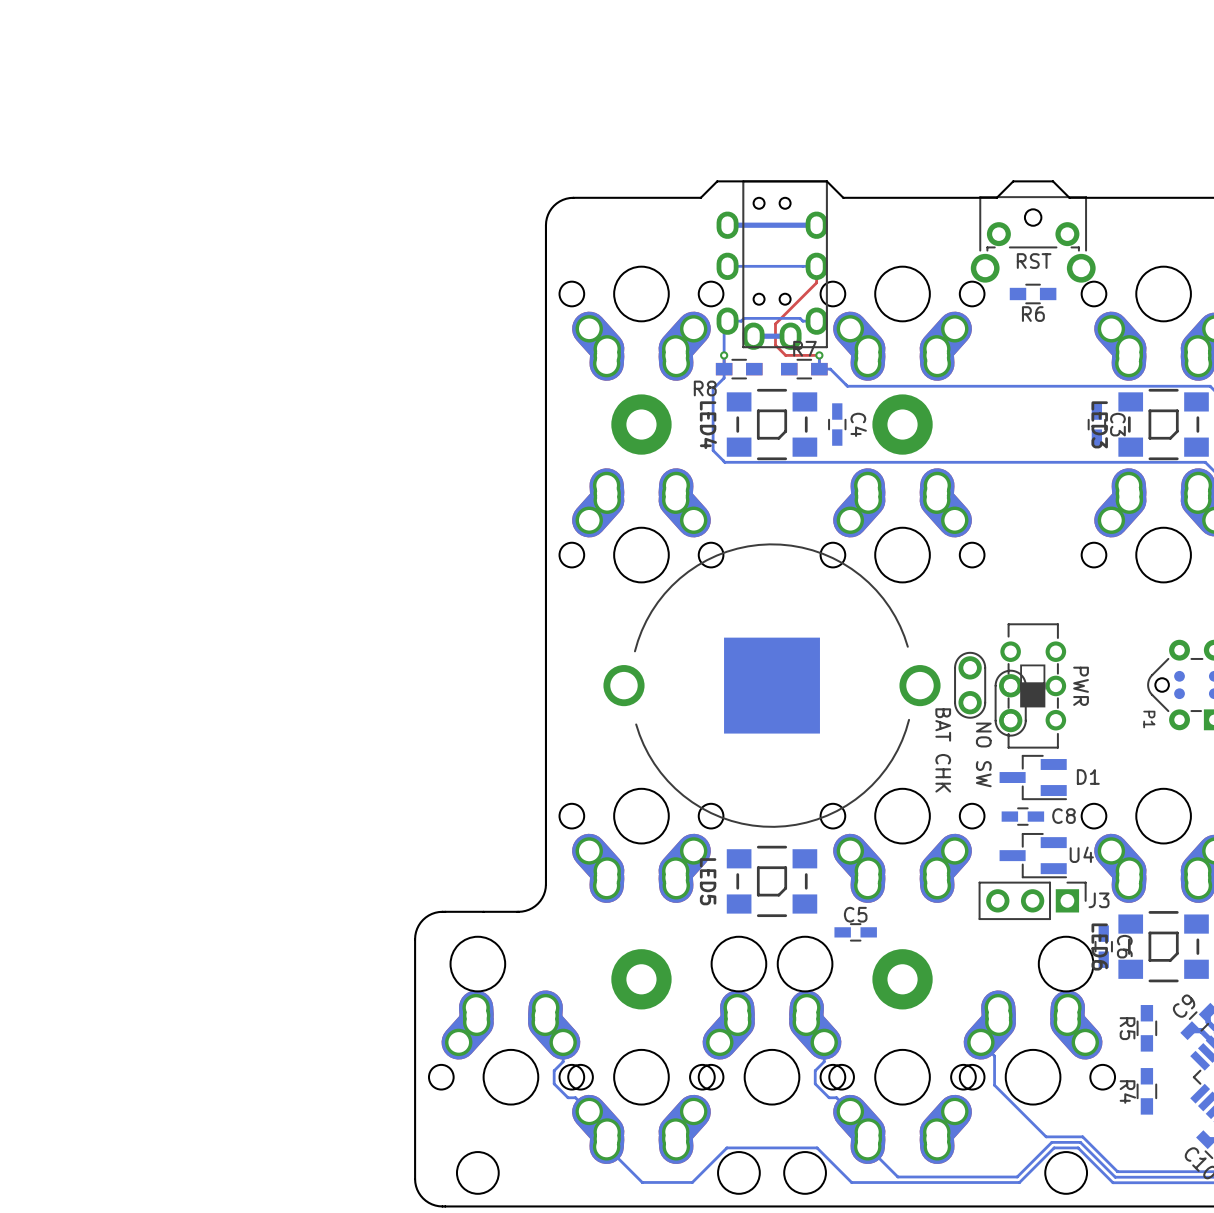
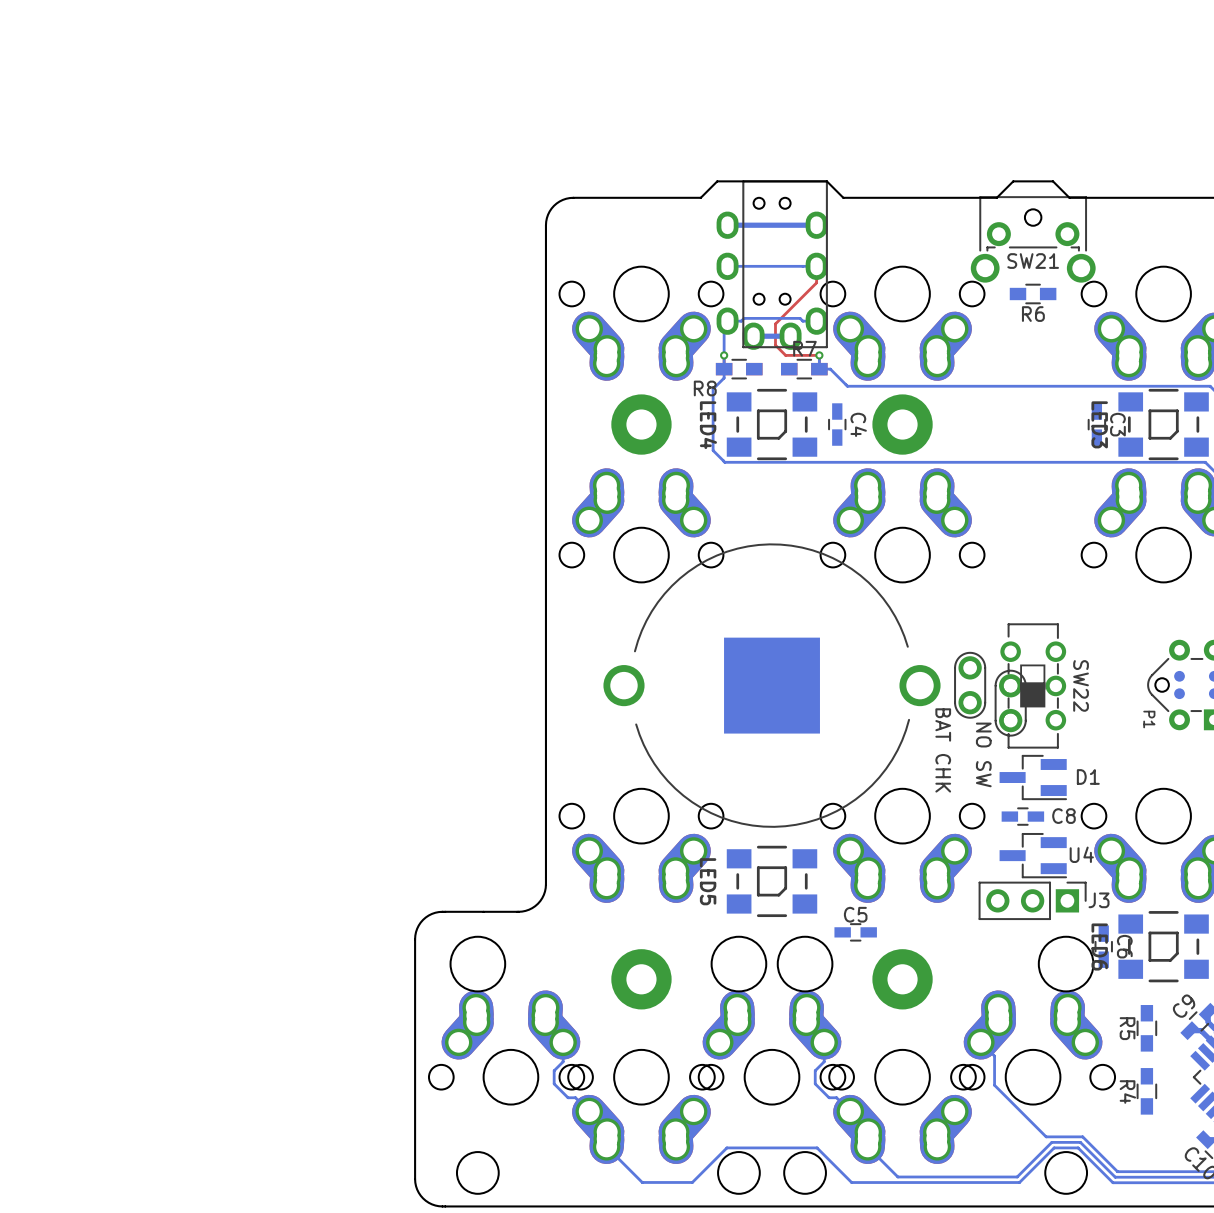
RST name: RST (1034, 261) -> SW21 (1033, 261)
PWR name: PWR (1081, 686) -> SW22 (1081, 685)

